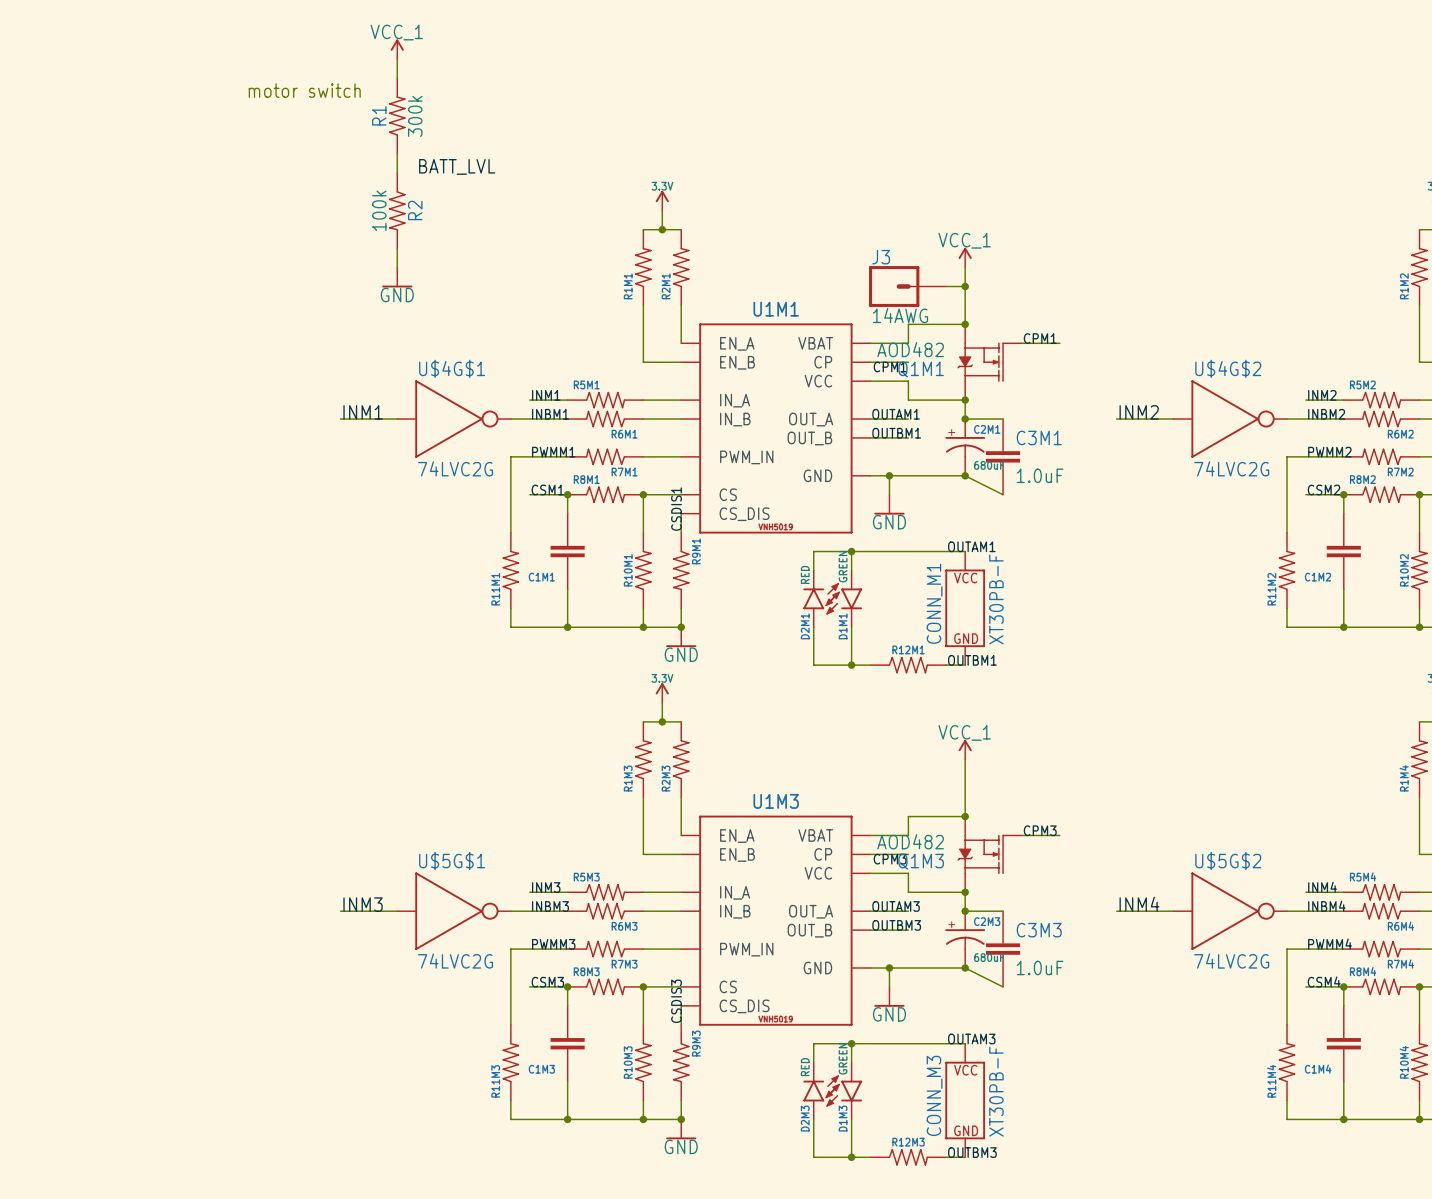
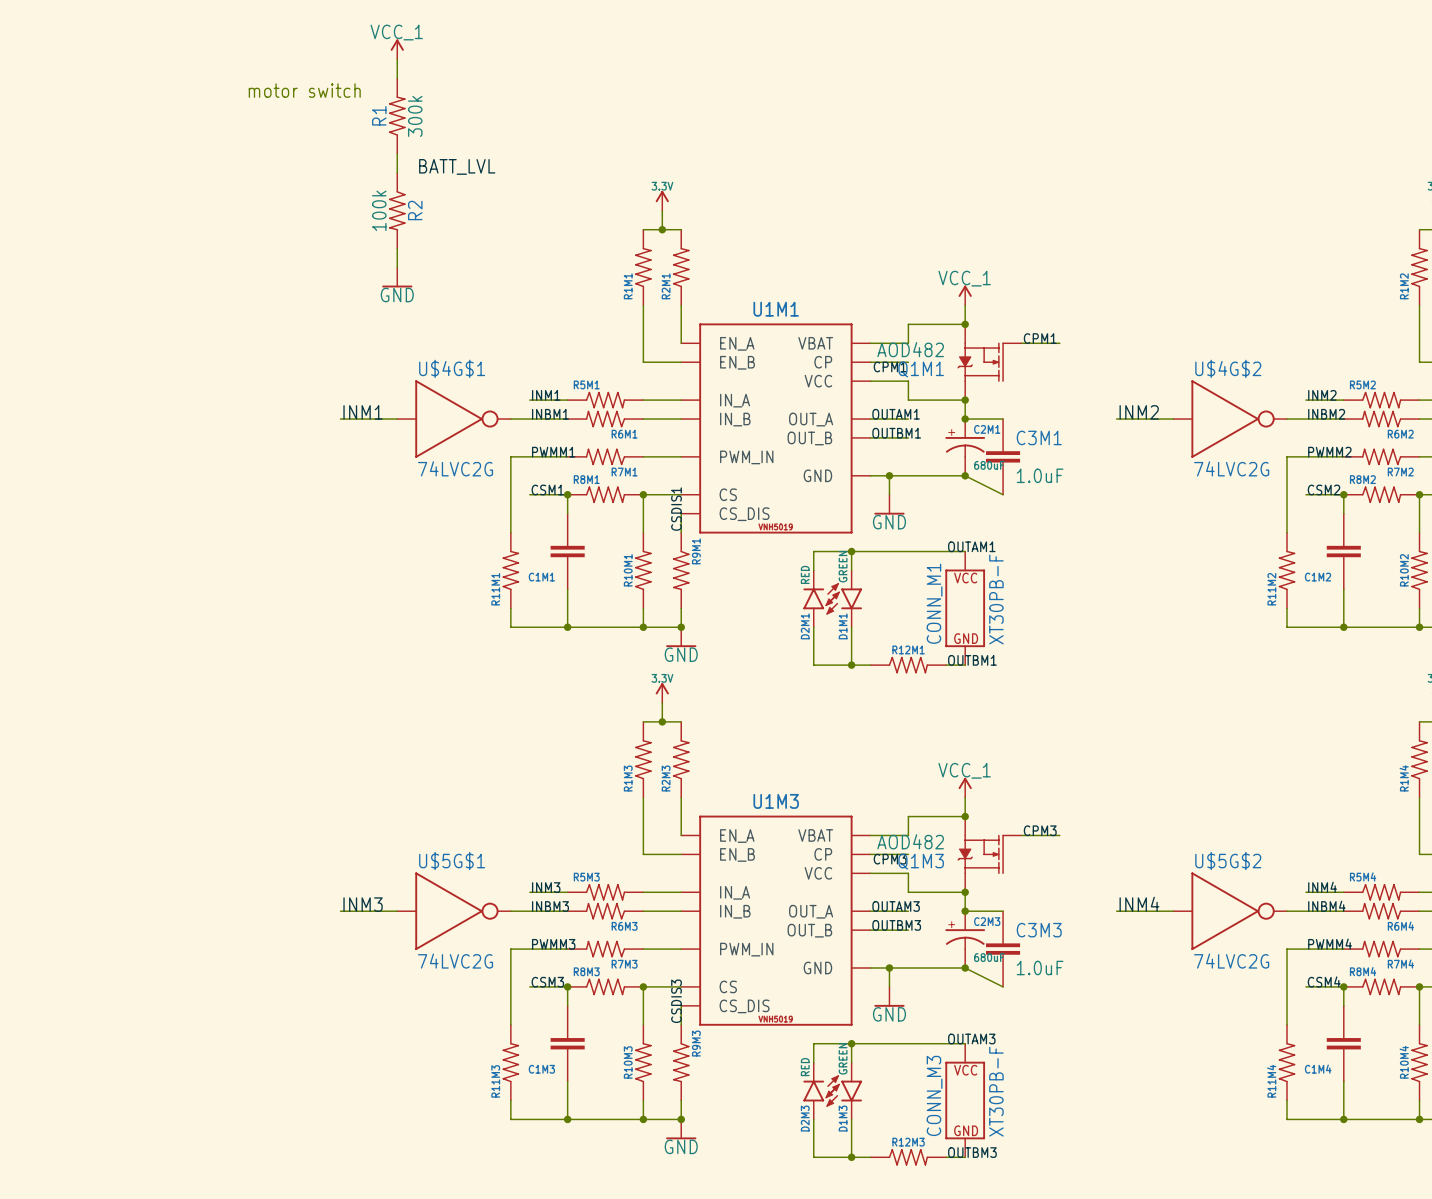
power symbol position: VCC_1 (965, 257) -> VCC_1 (965, 295)
J3: 14AWG (907, 286) -> none
wire: (946, 286) (965, 286) -> none
junction: (965, 286) -> none
power symbol position: VCC_1 (965, 749) -> VCC_1 (965, 787)

